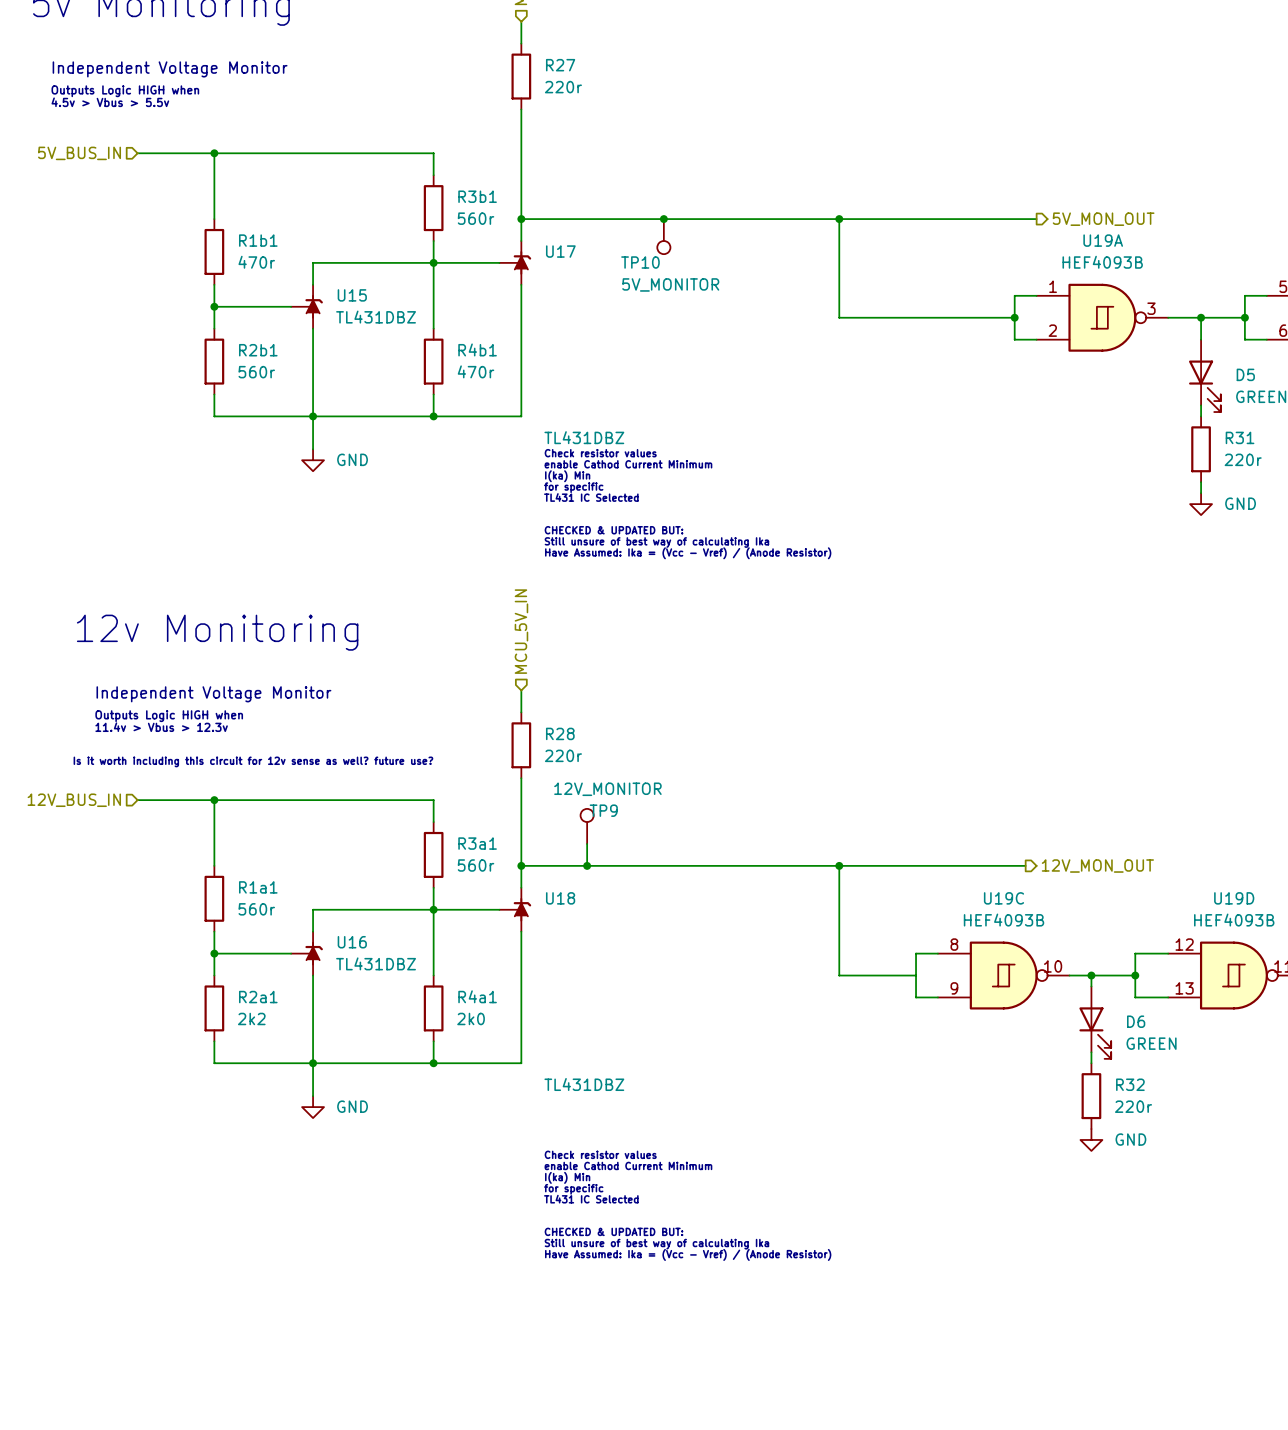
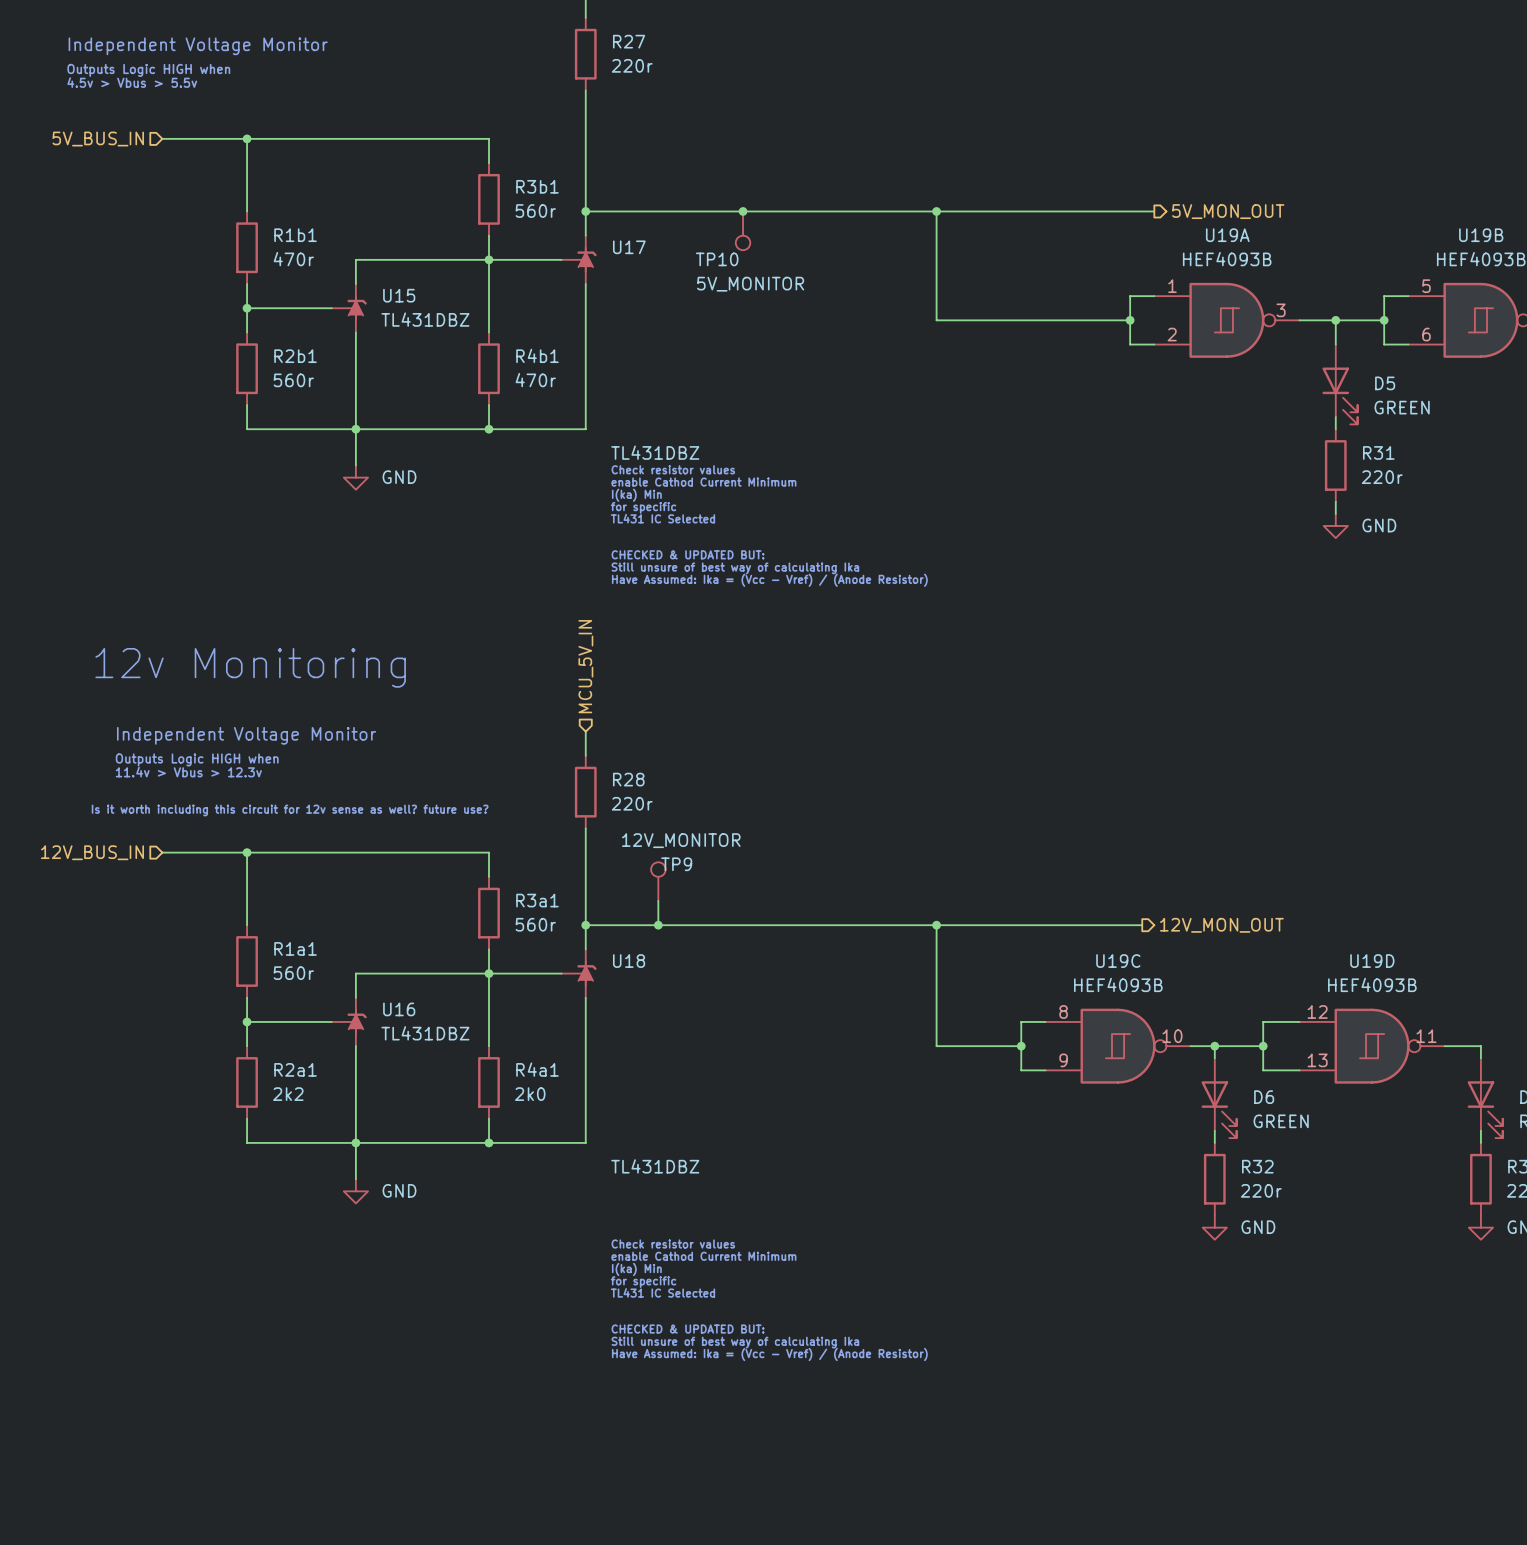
junction: none -> (1021, 1046)

